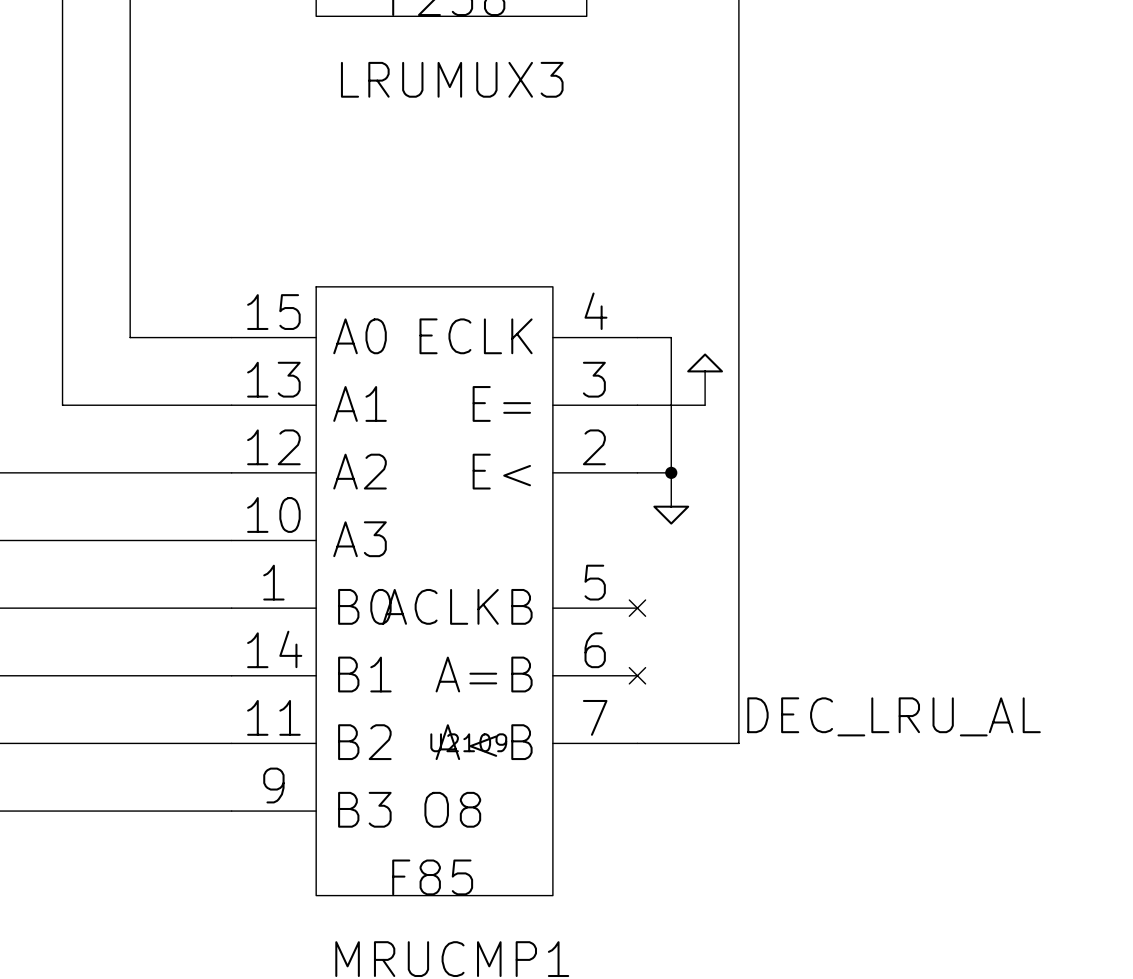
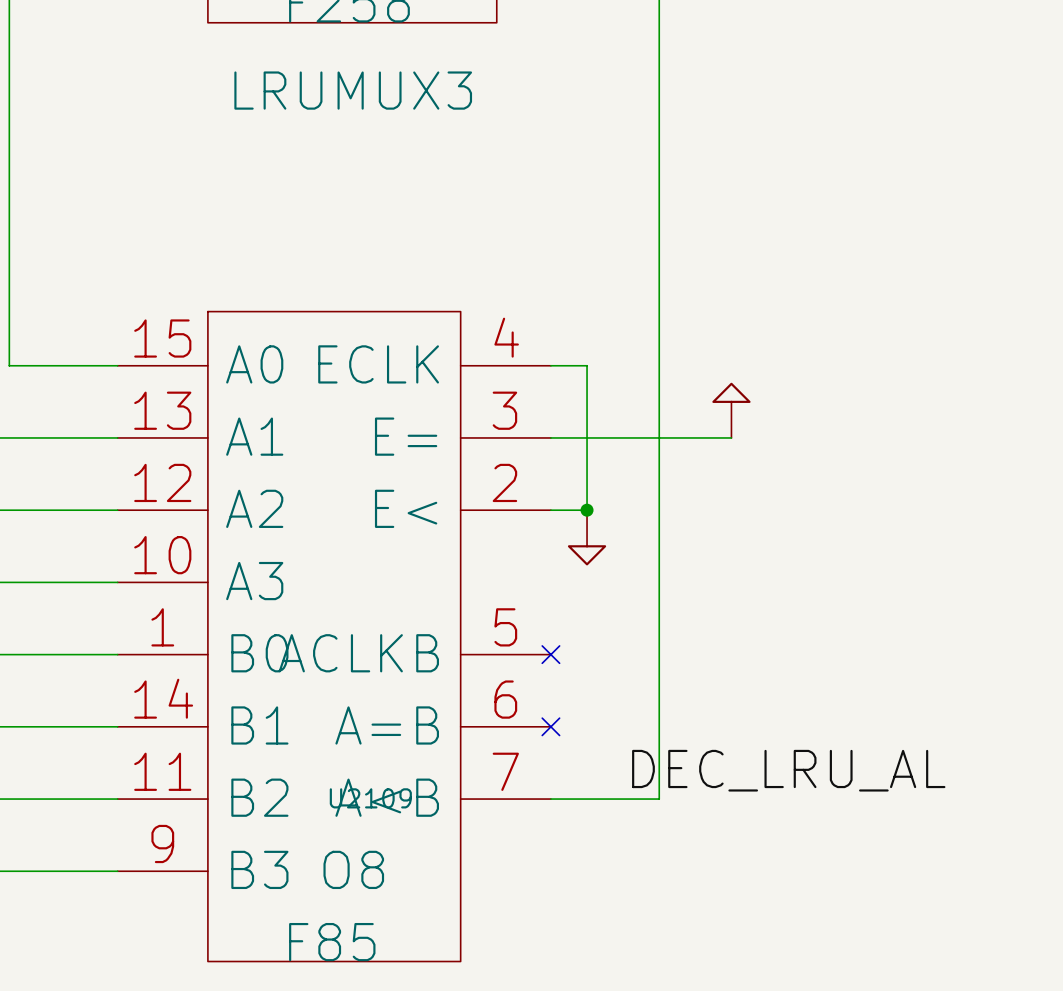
power symbol position: (705, 379) -> (731, 410)
wire: none -> (623, 437) (731, 437)
label position: DEC_LRU_AL (894, 716) -> DEC_LRU_AL (788, 770)

